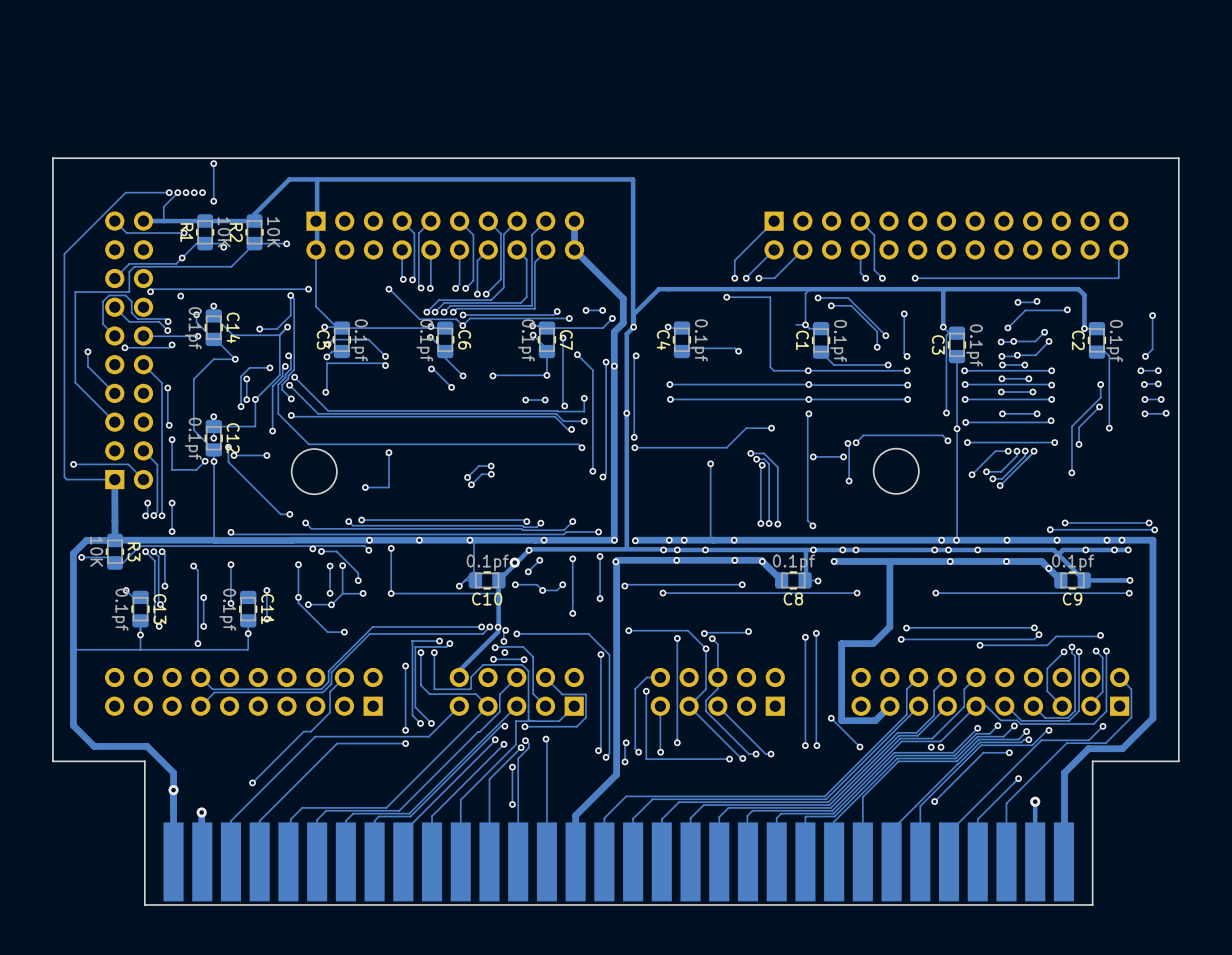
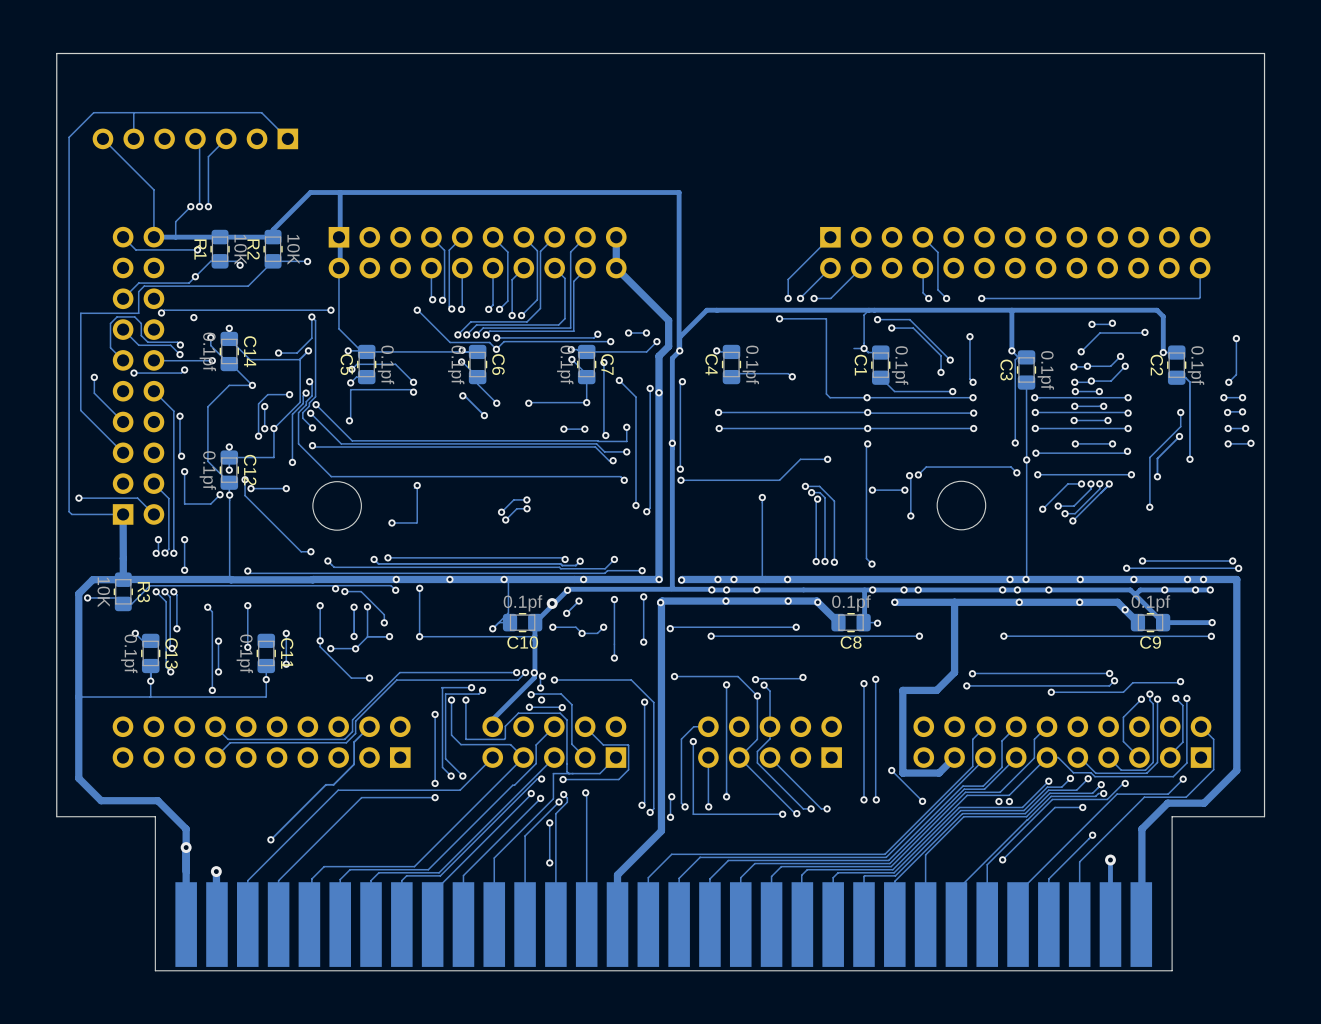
track: none -> (133, 112) (133, 138)
track: none -> (195, 138) (199, 143) (199, 206)
part: none -> (195, 138)
track: none -> (226, 138) (208, 156) (208, 206)
track: none -> (101, 140) (102, 138) (153, 189) (153, 237)
board edge: (1178, 158) (52, 158) -> (1264, 169) (1264, 53) (56, 53) (56, 169)
track: (213, 163) (213, 201) -> none
via: (213, 163) -> none
track: (169, 192) (125, 192) (64, 254) -> (287, 138) (261, 112) (93, 112) (69, 137) (69, 272)
via: (169, 192) -> none
via: (202, 192) -> none
via: (213, 201) -> none

